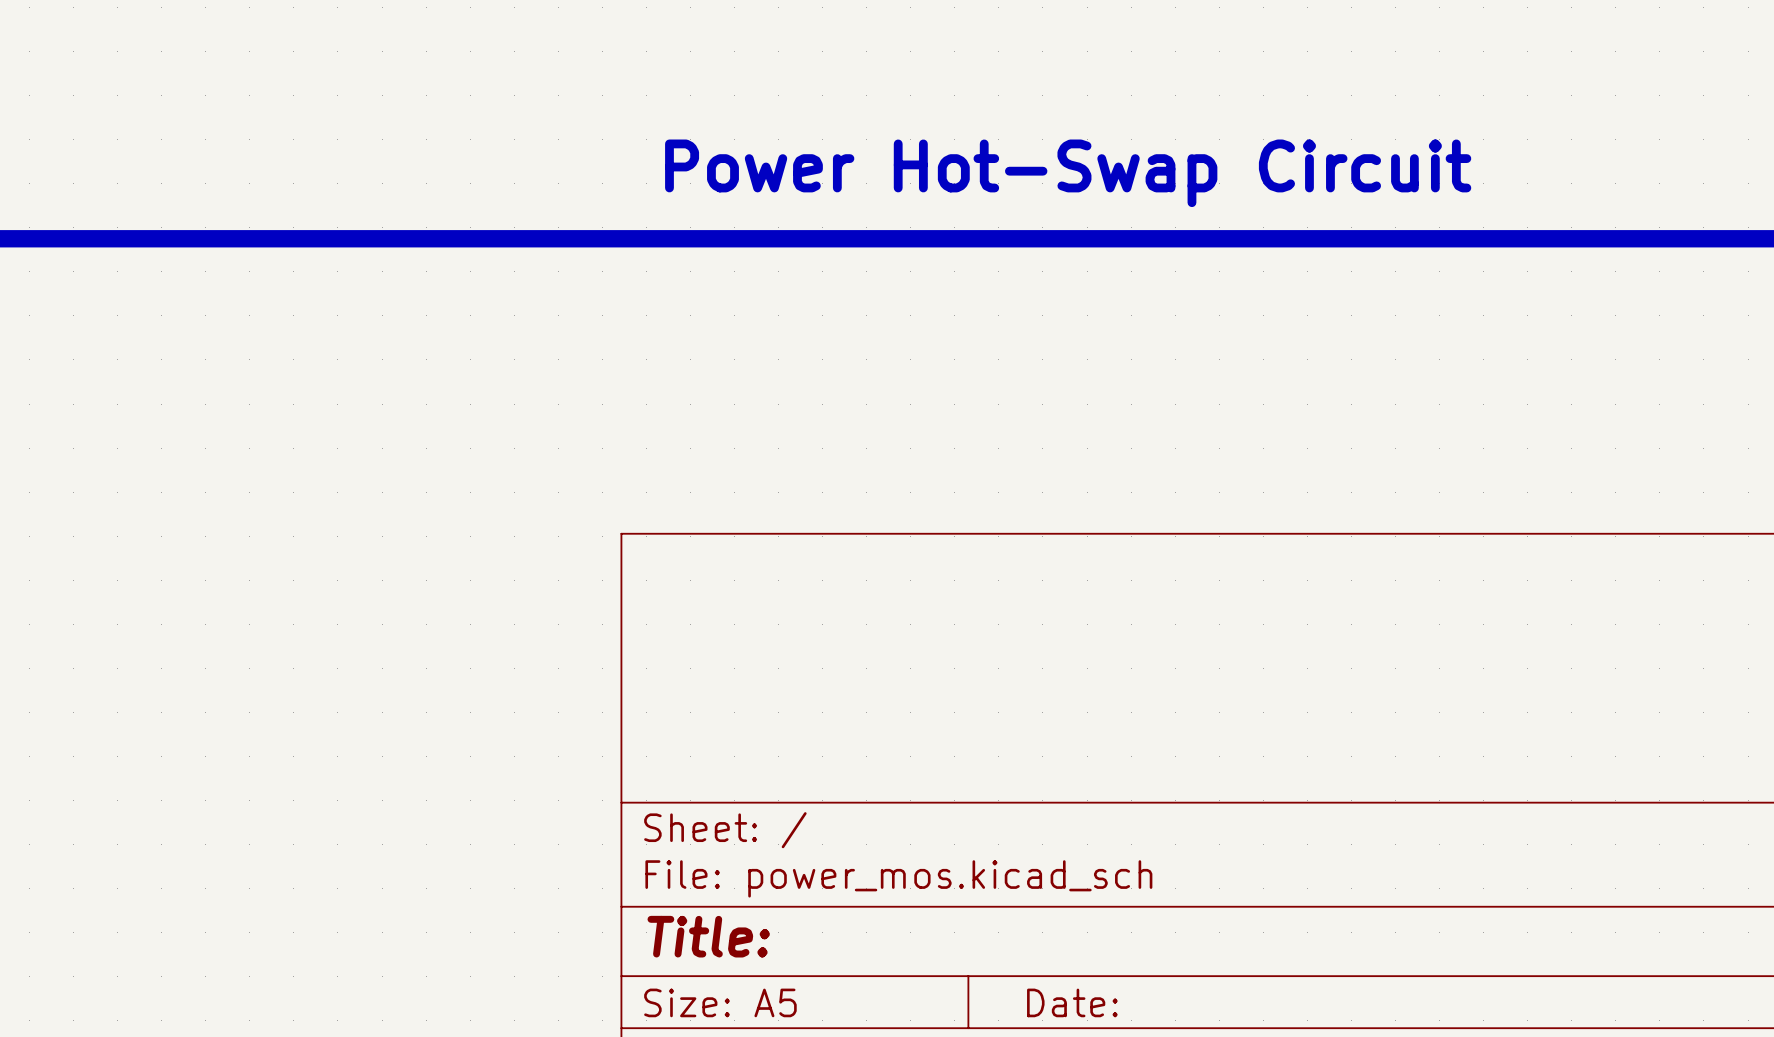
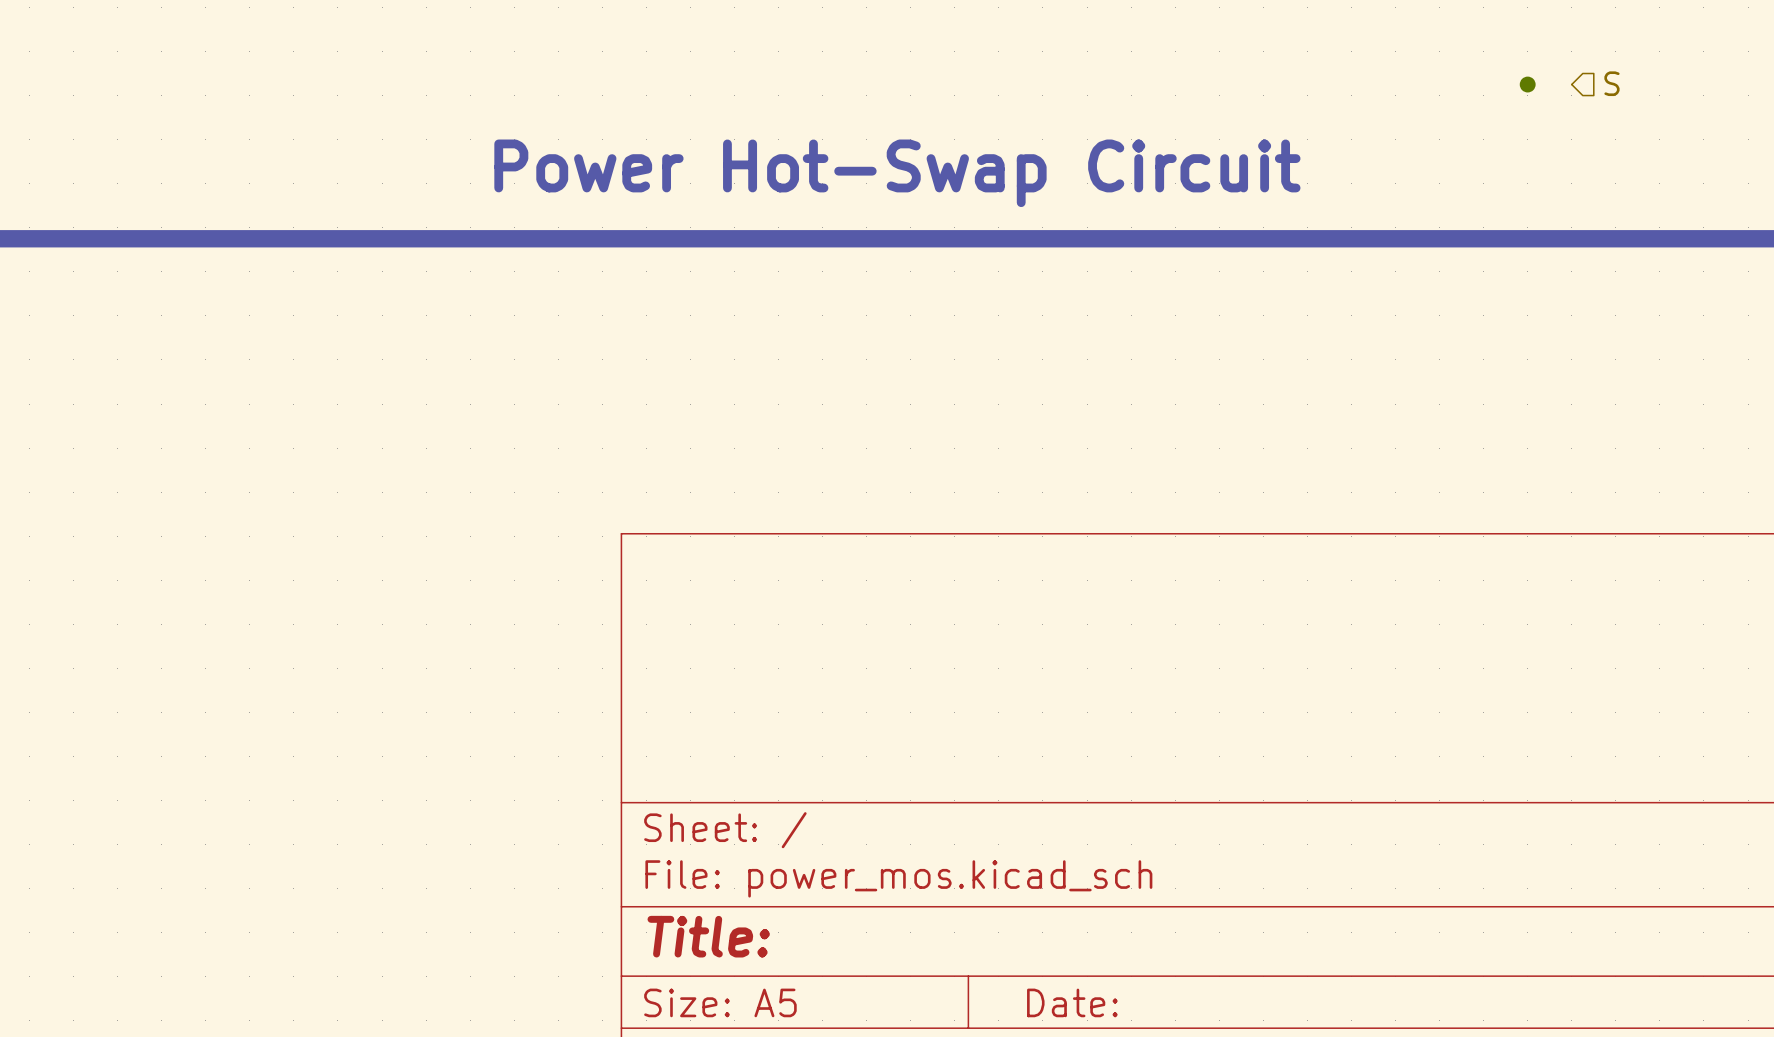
hierarchical label: none -> S (1611, 83)
junction: none -> (1527, 84)
text position: Power Hot-Swap Circuit (1068, 173) -> Power Hot-Swap Circuit (897, 173)

